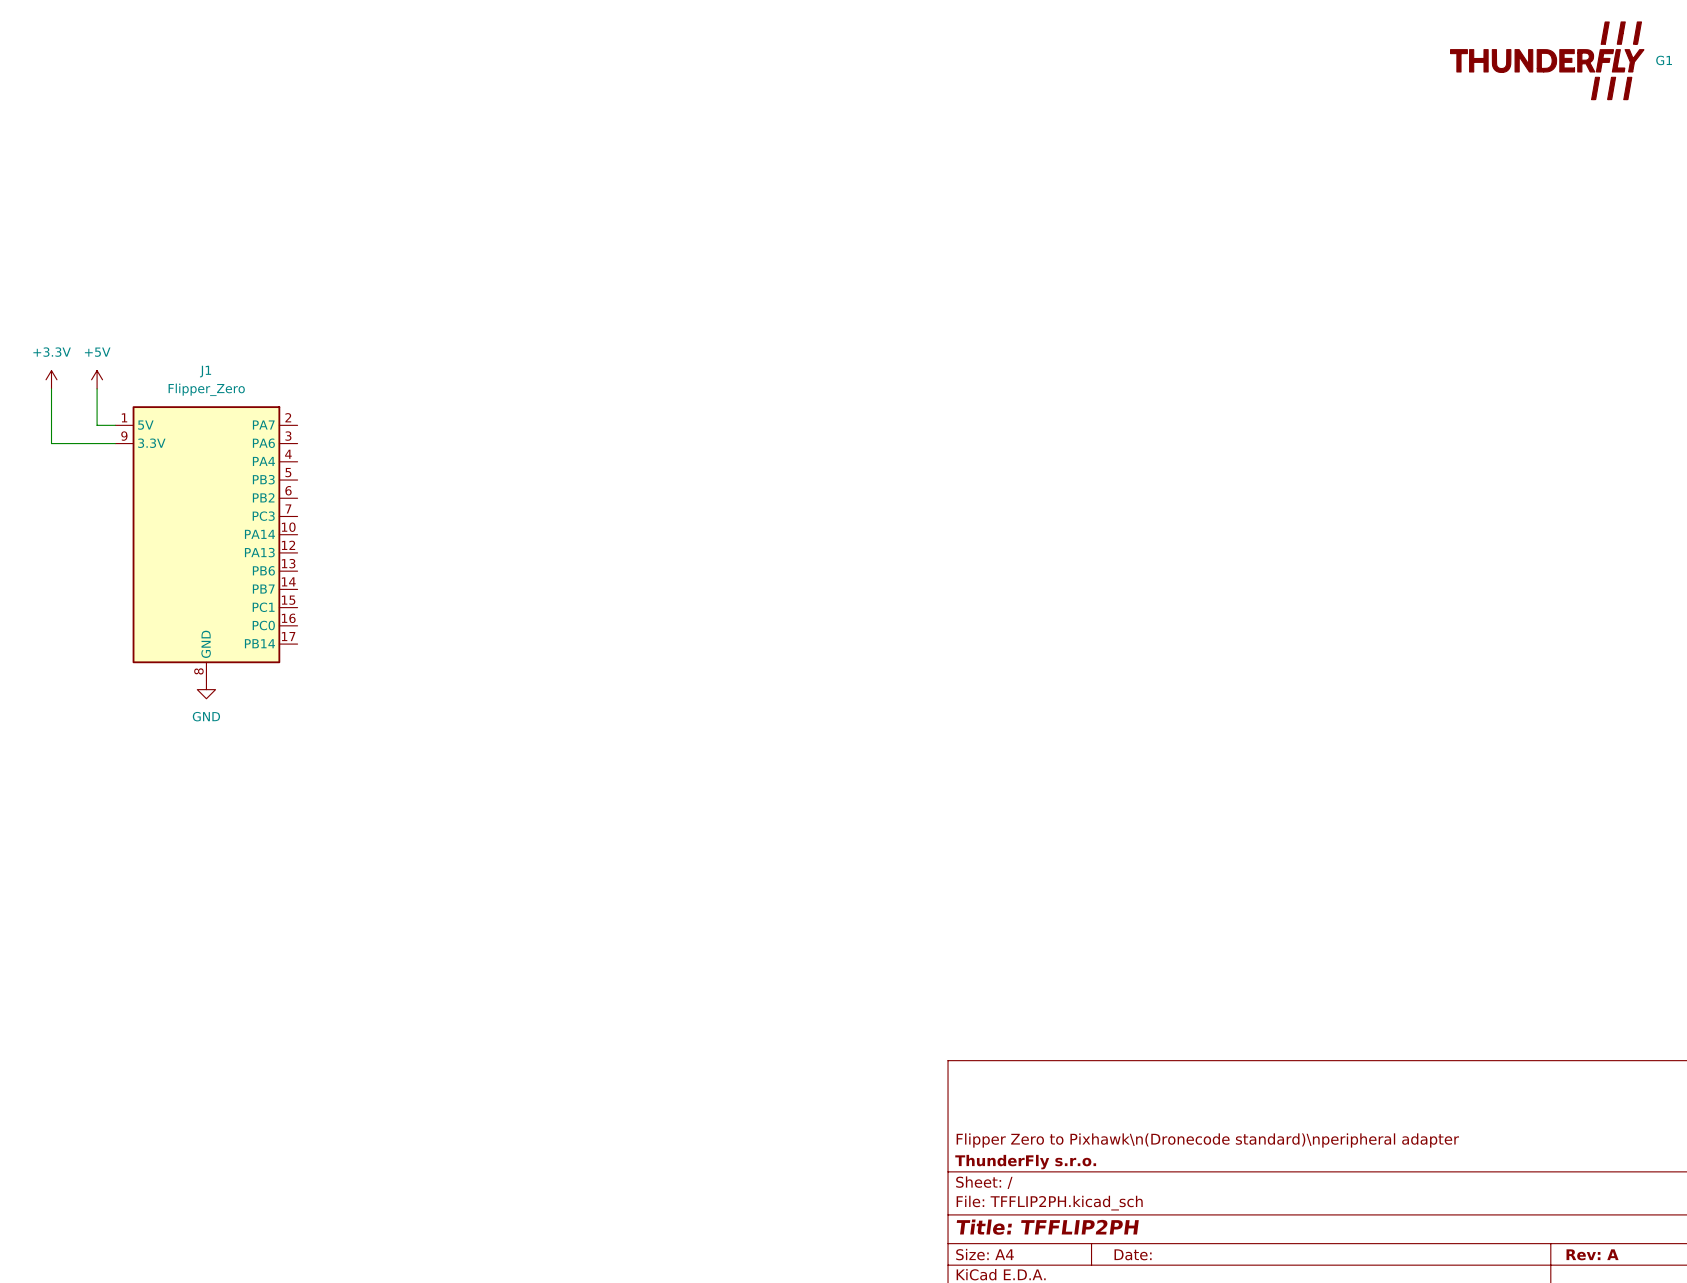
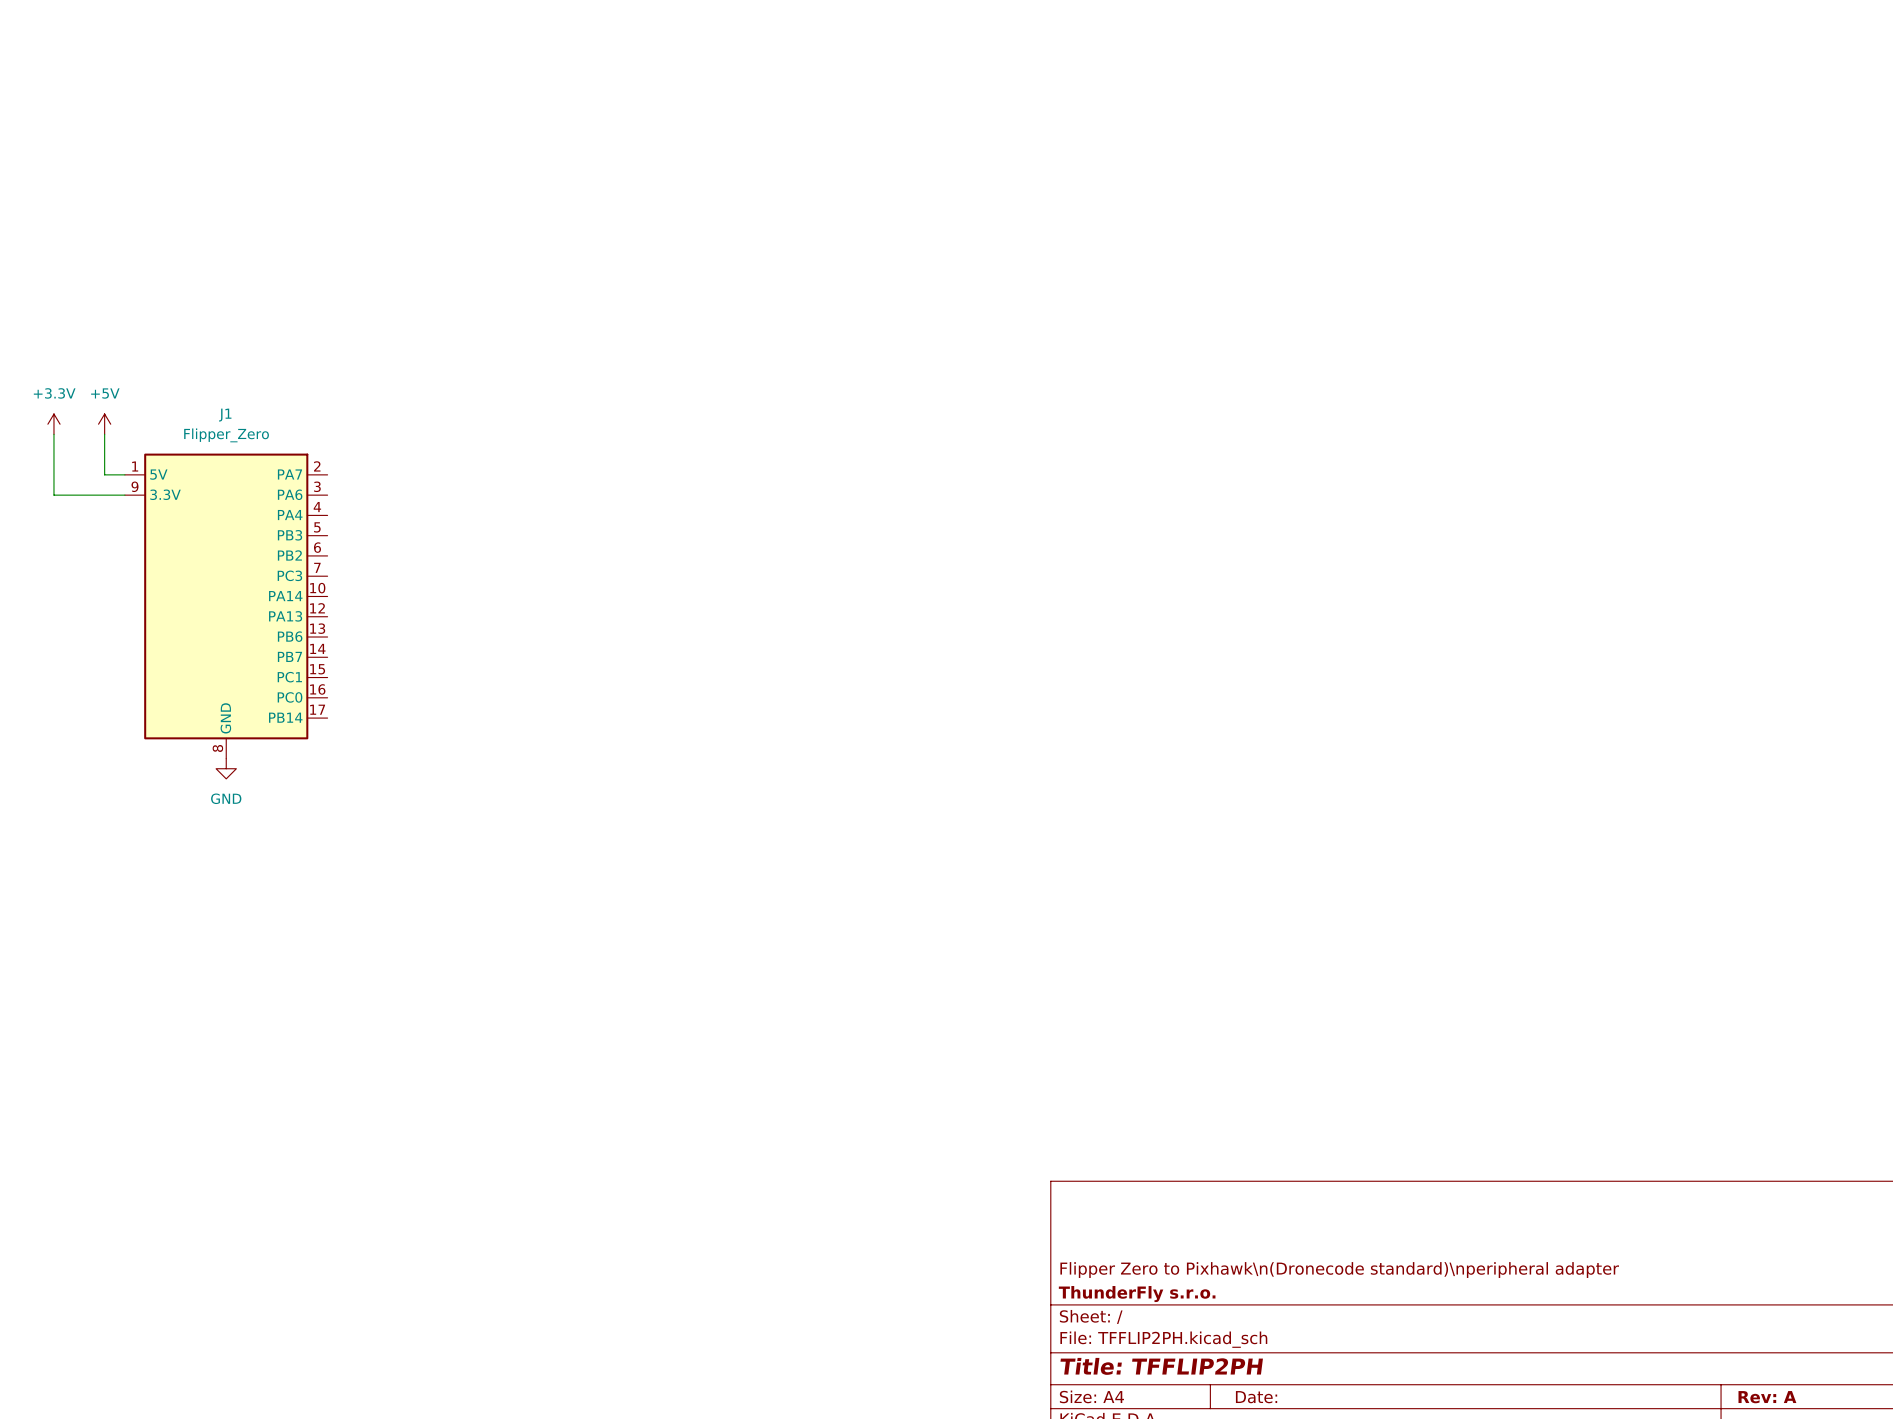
G1: (1547, 60) -> none

